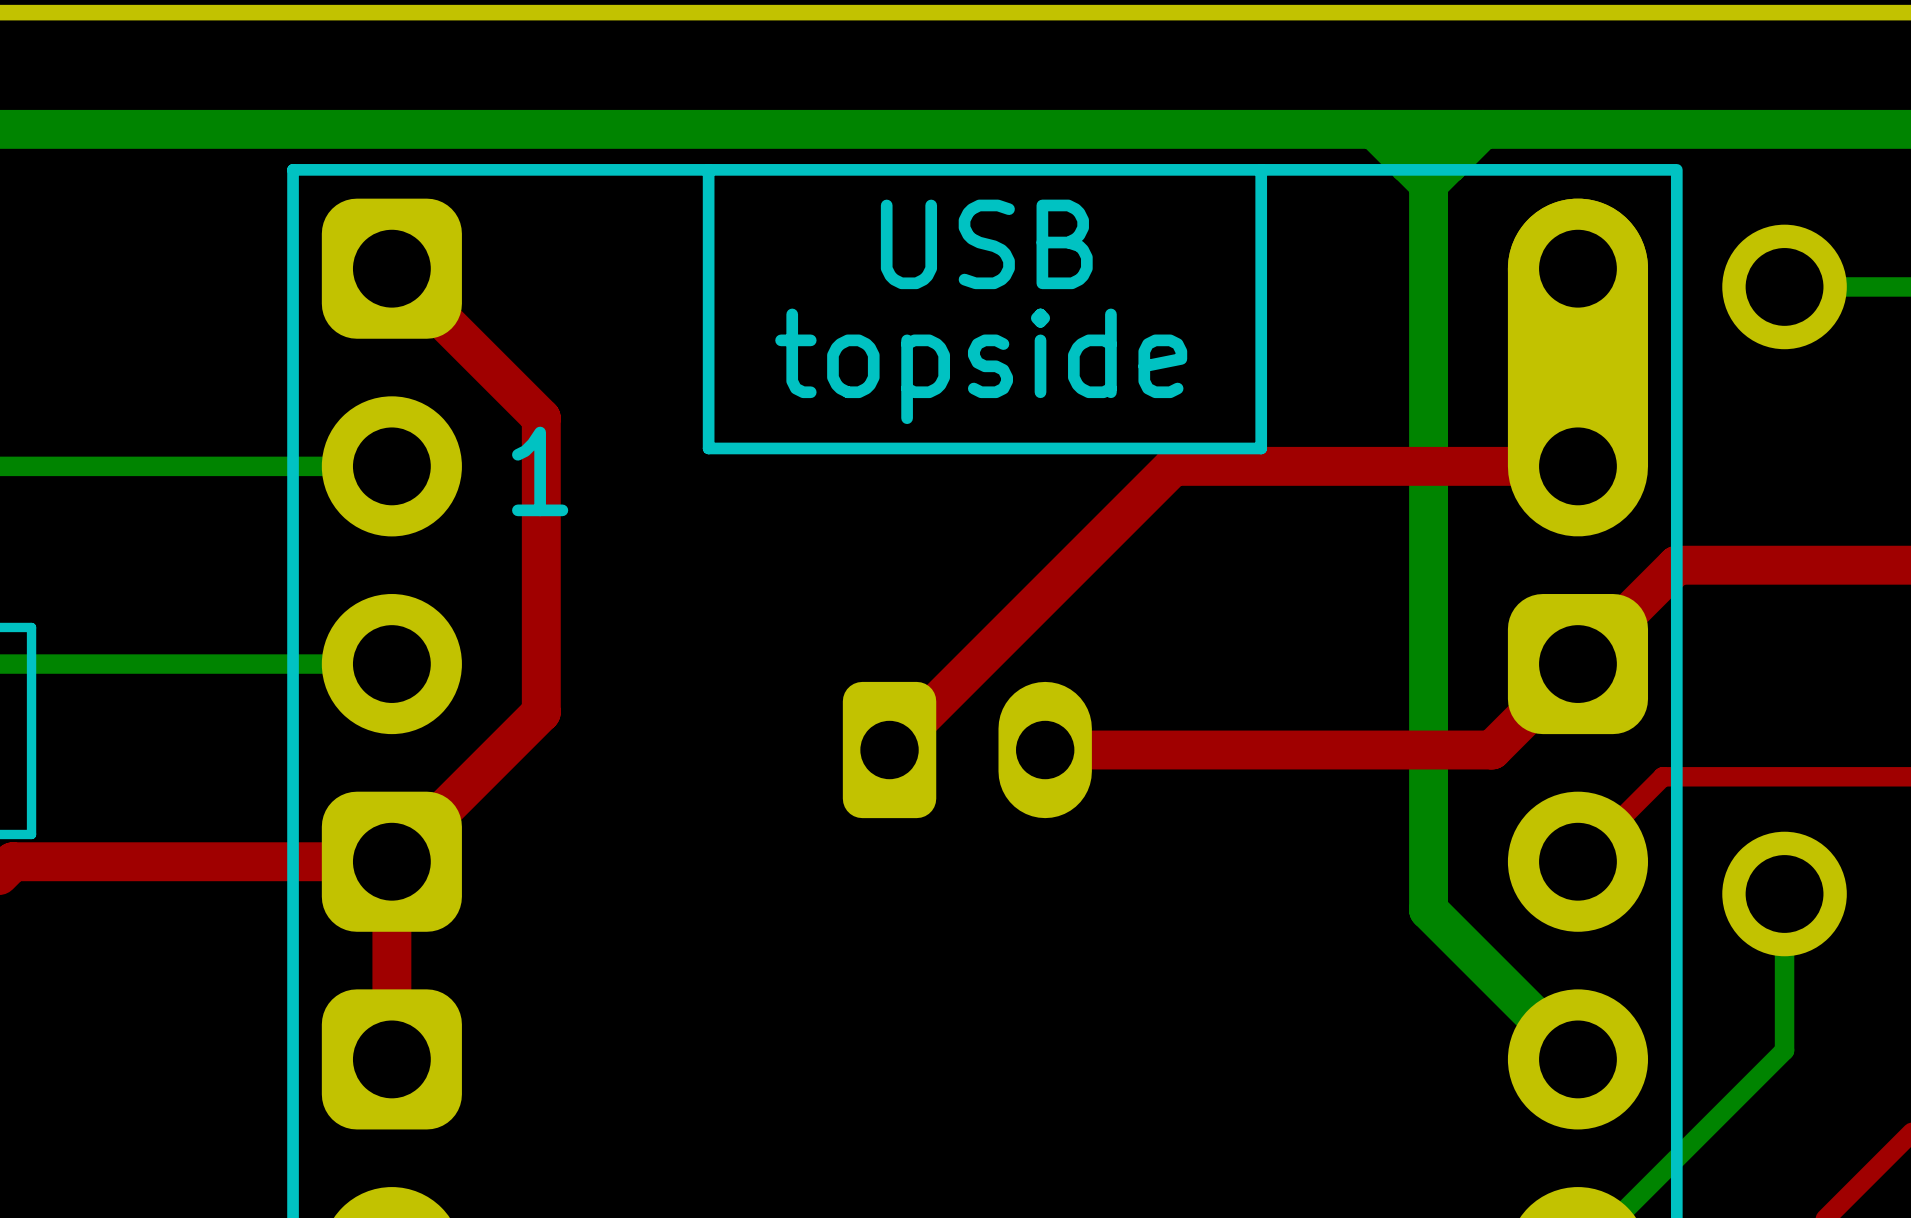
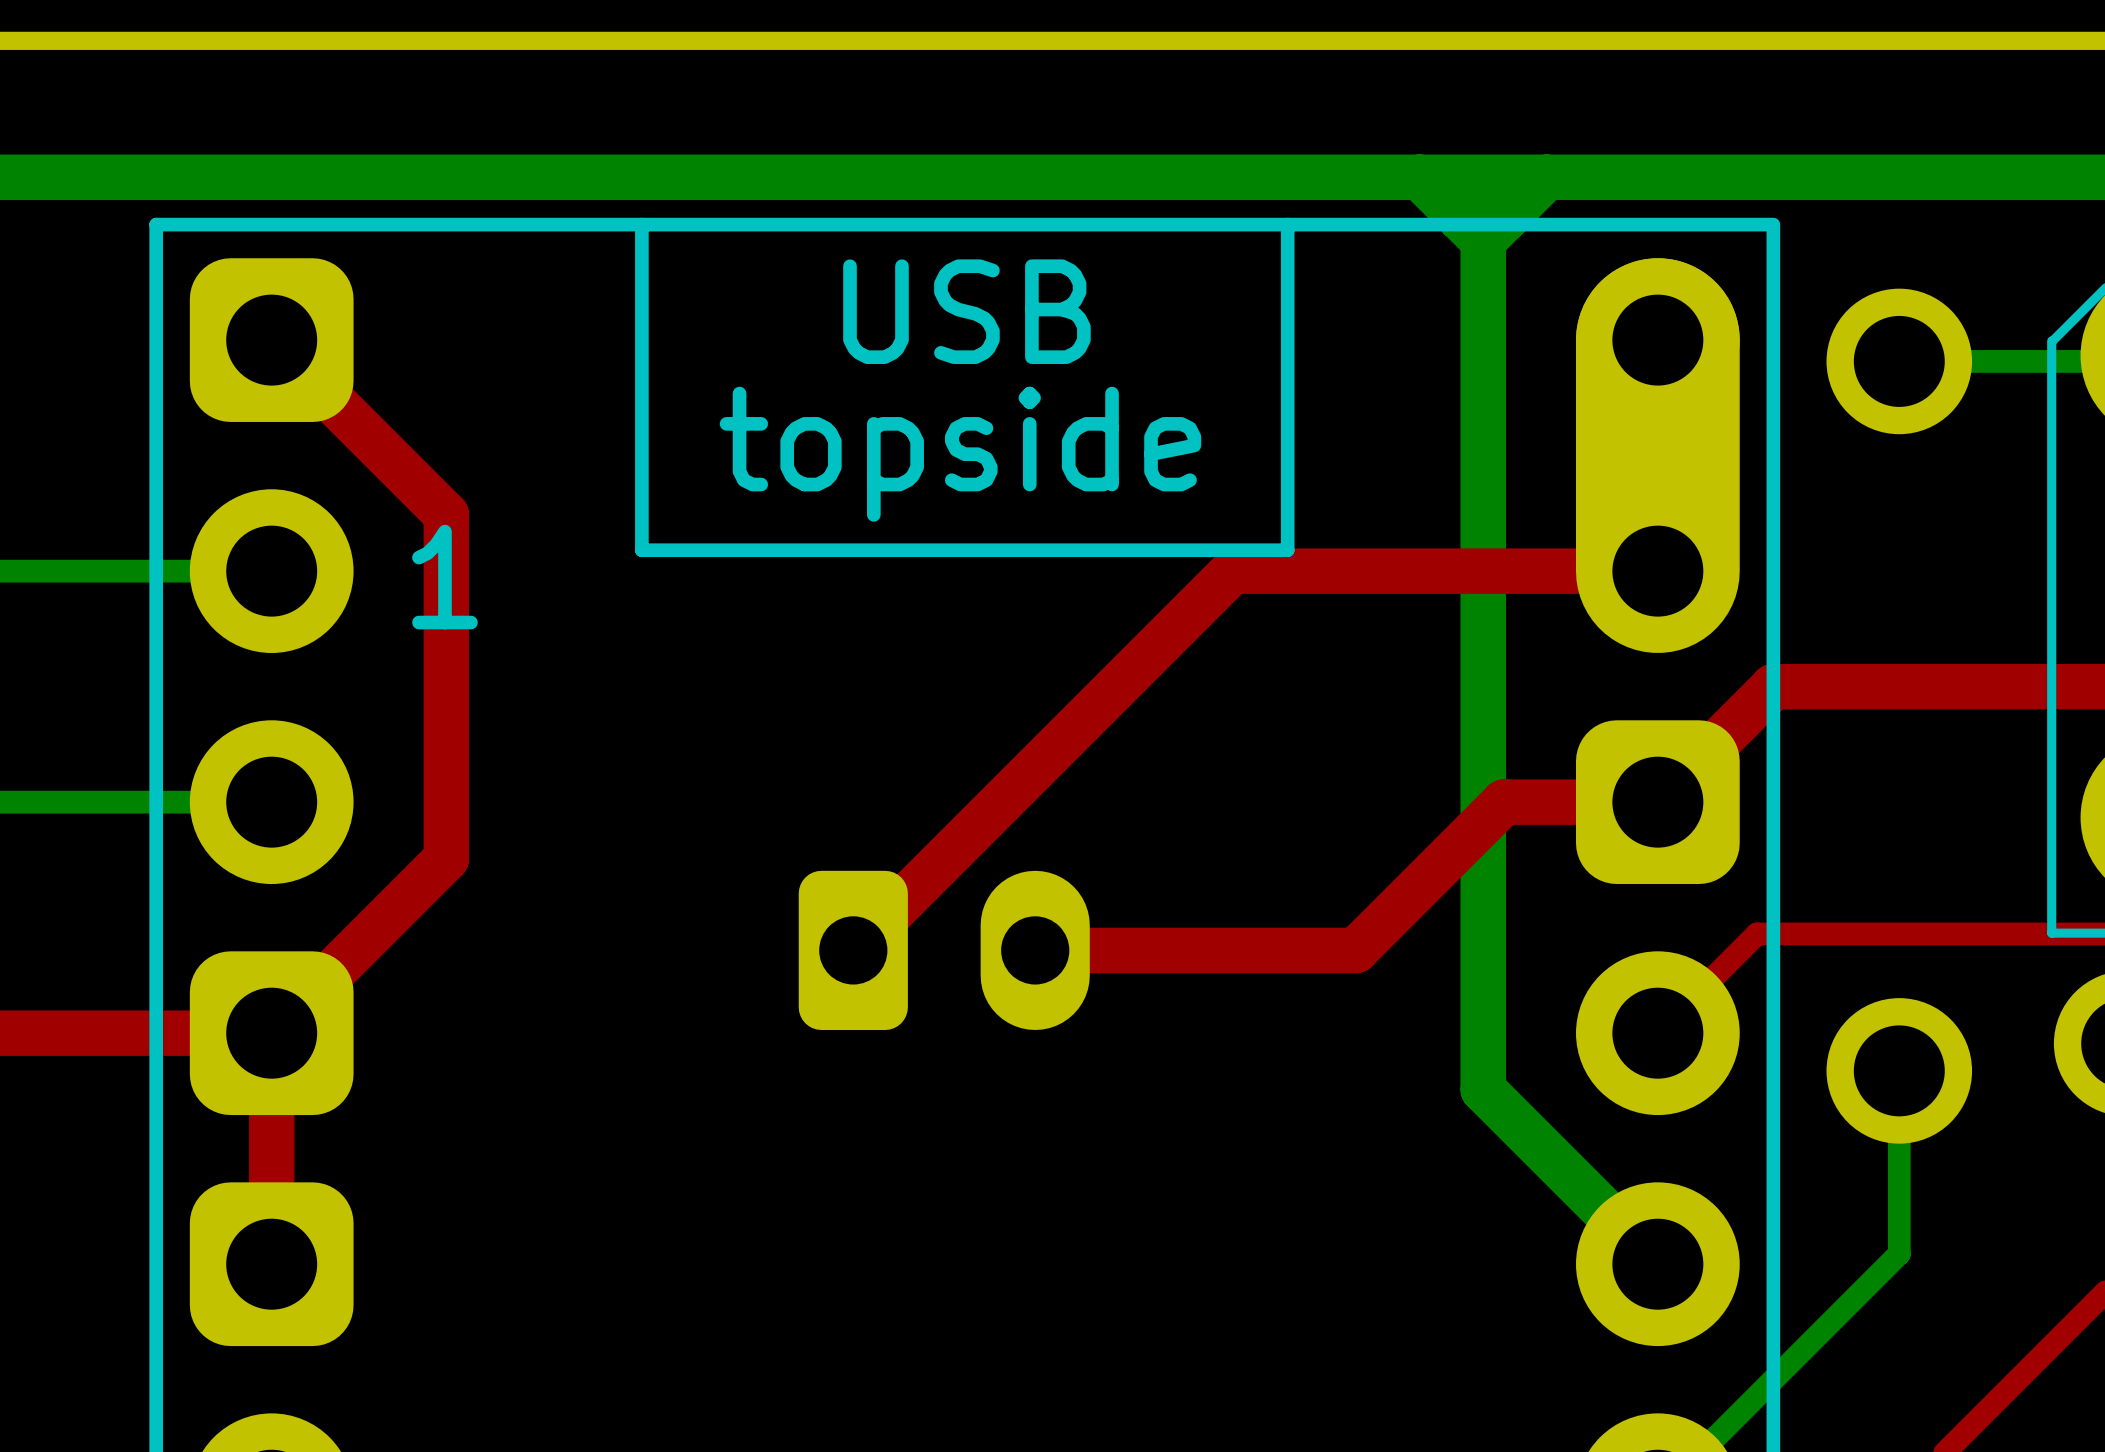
top track: (1214, 466) (1173, 466) (889, 750) -> (1232, 571) (853, 950)
top track: (1577, 664) (1492, 750) (1045, 750) -> (1657, 802) (1504, 802) (1355, 950) (1035, 950)
part position: (967, 750) -> (944, 950)

